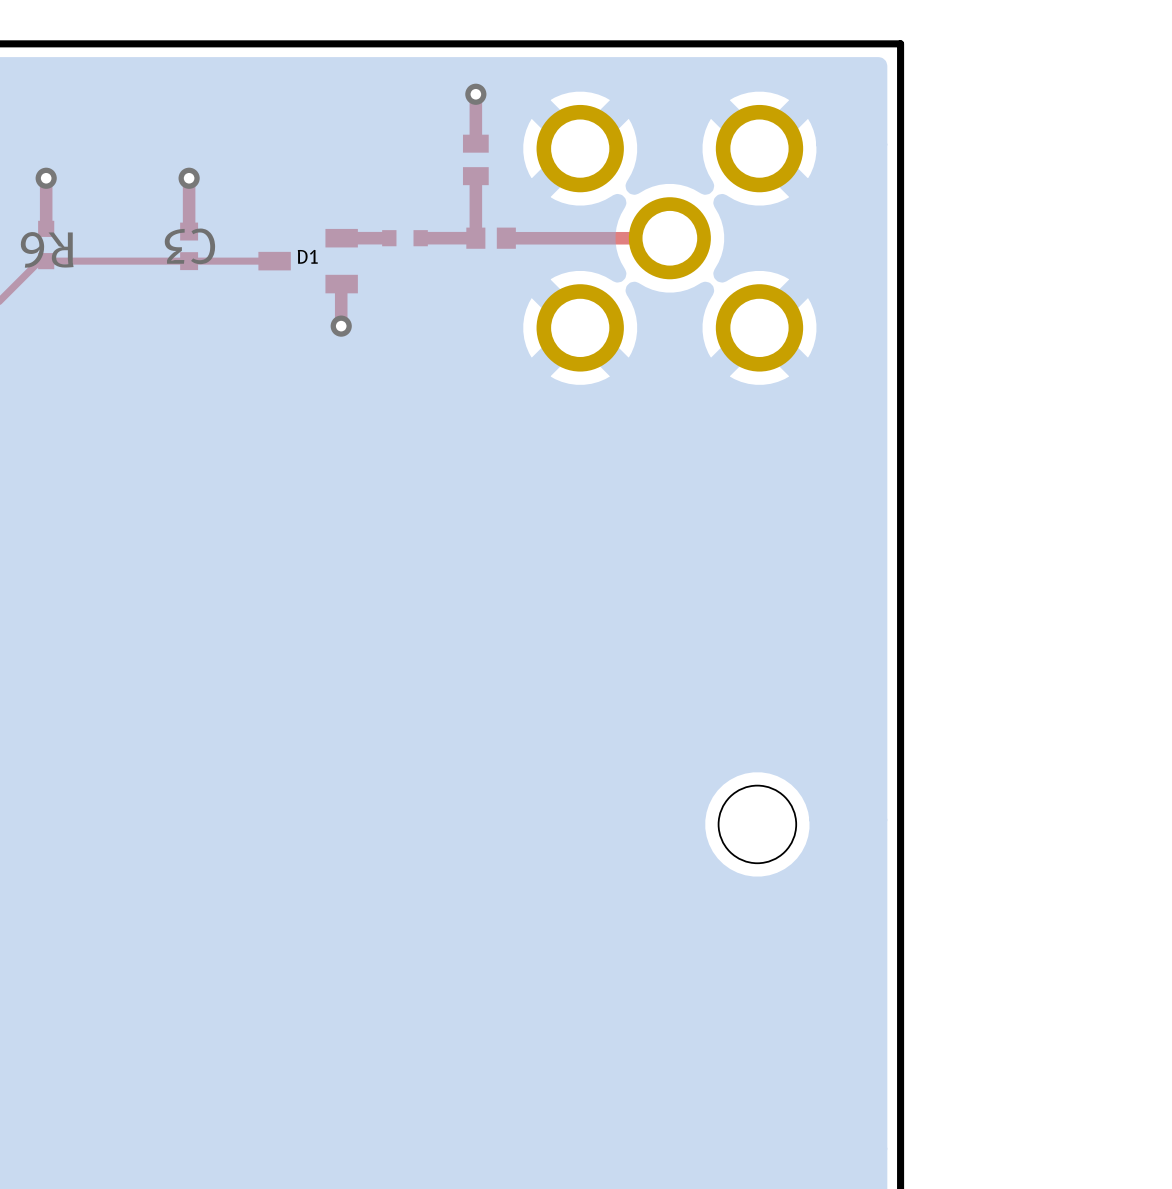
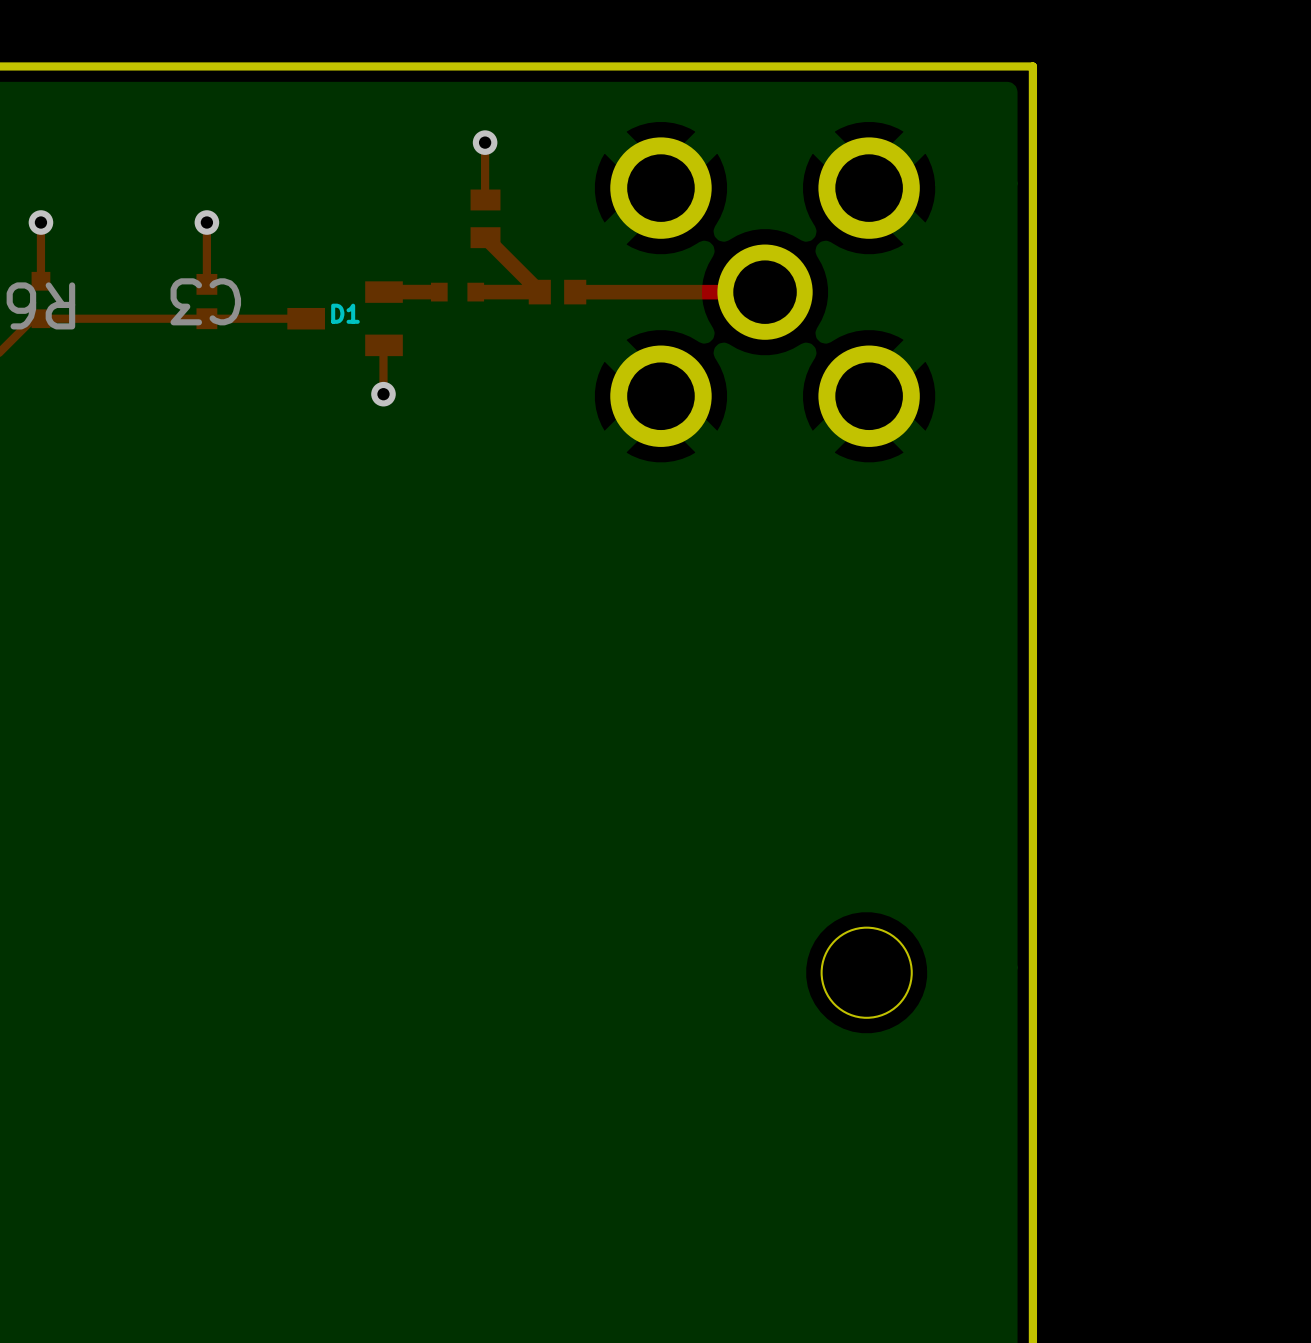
top track: (475, 94) (475, 143) -> (485, 142) (485, 199)
via position: (475, 94) -> (485, 142)
part position: (475, 159) -> (485, 218)
top track: (475, 176) (475, 238) -> (485, 237) (539, 291)
top track width: thick (46, 178) (46, 228) -> thin (40, 222) (40, 281)
top track width: thick (189, 178) (189, 231) -> thin (206, 222) (206, 284)
top track width: thick (341, 284) (341, 326) -> thin (383, 345) (383, 394)

